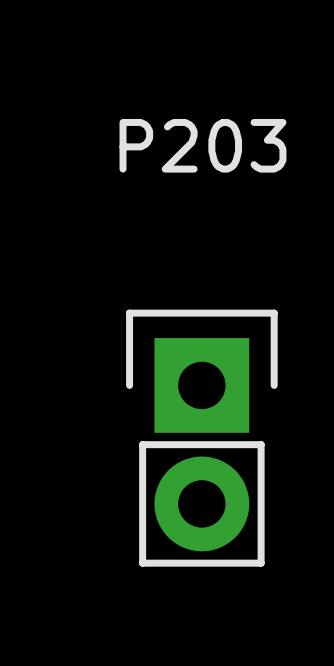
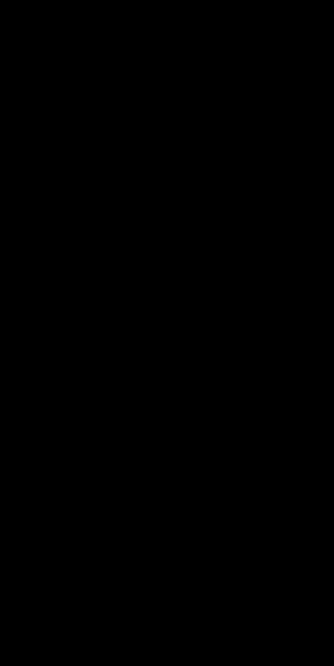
P203: (201, 438) -> none

